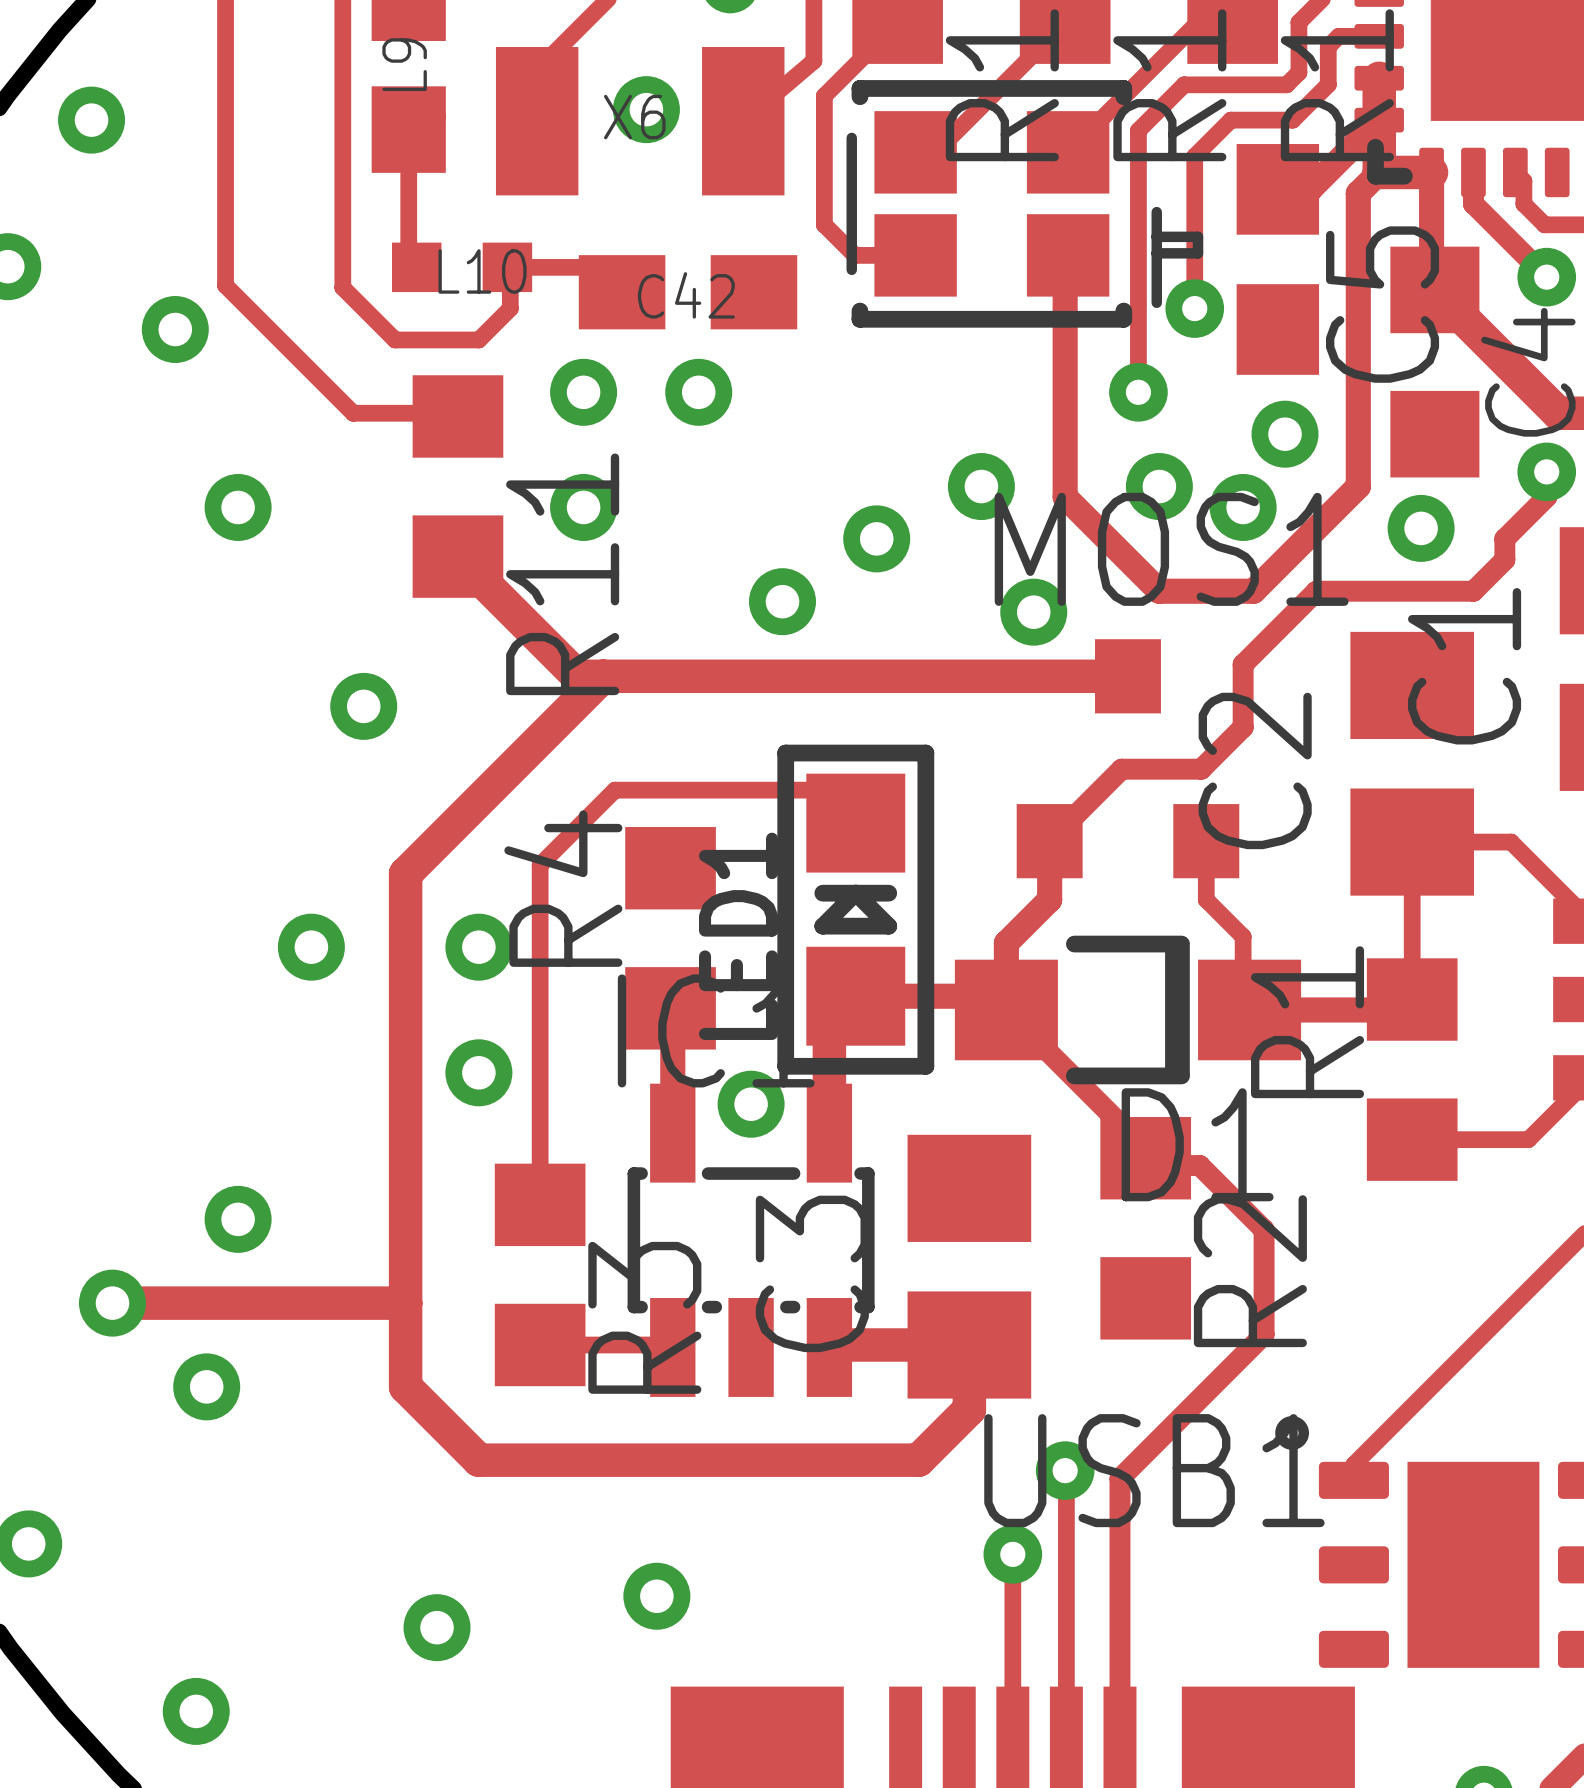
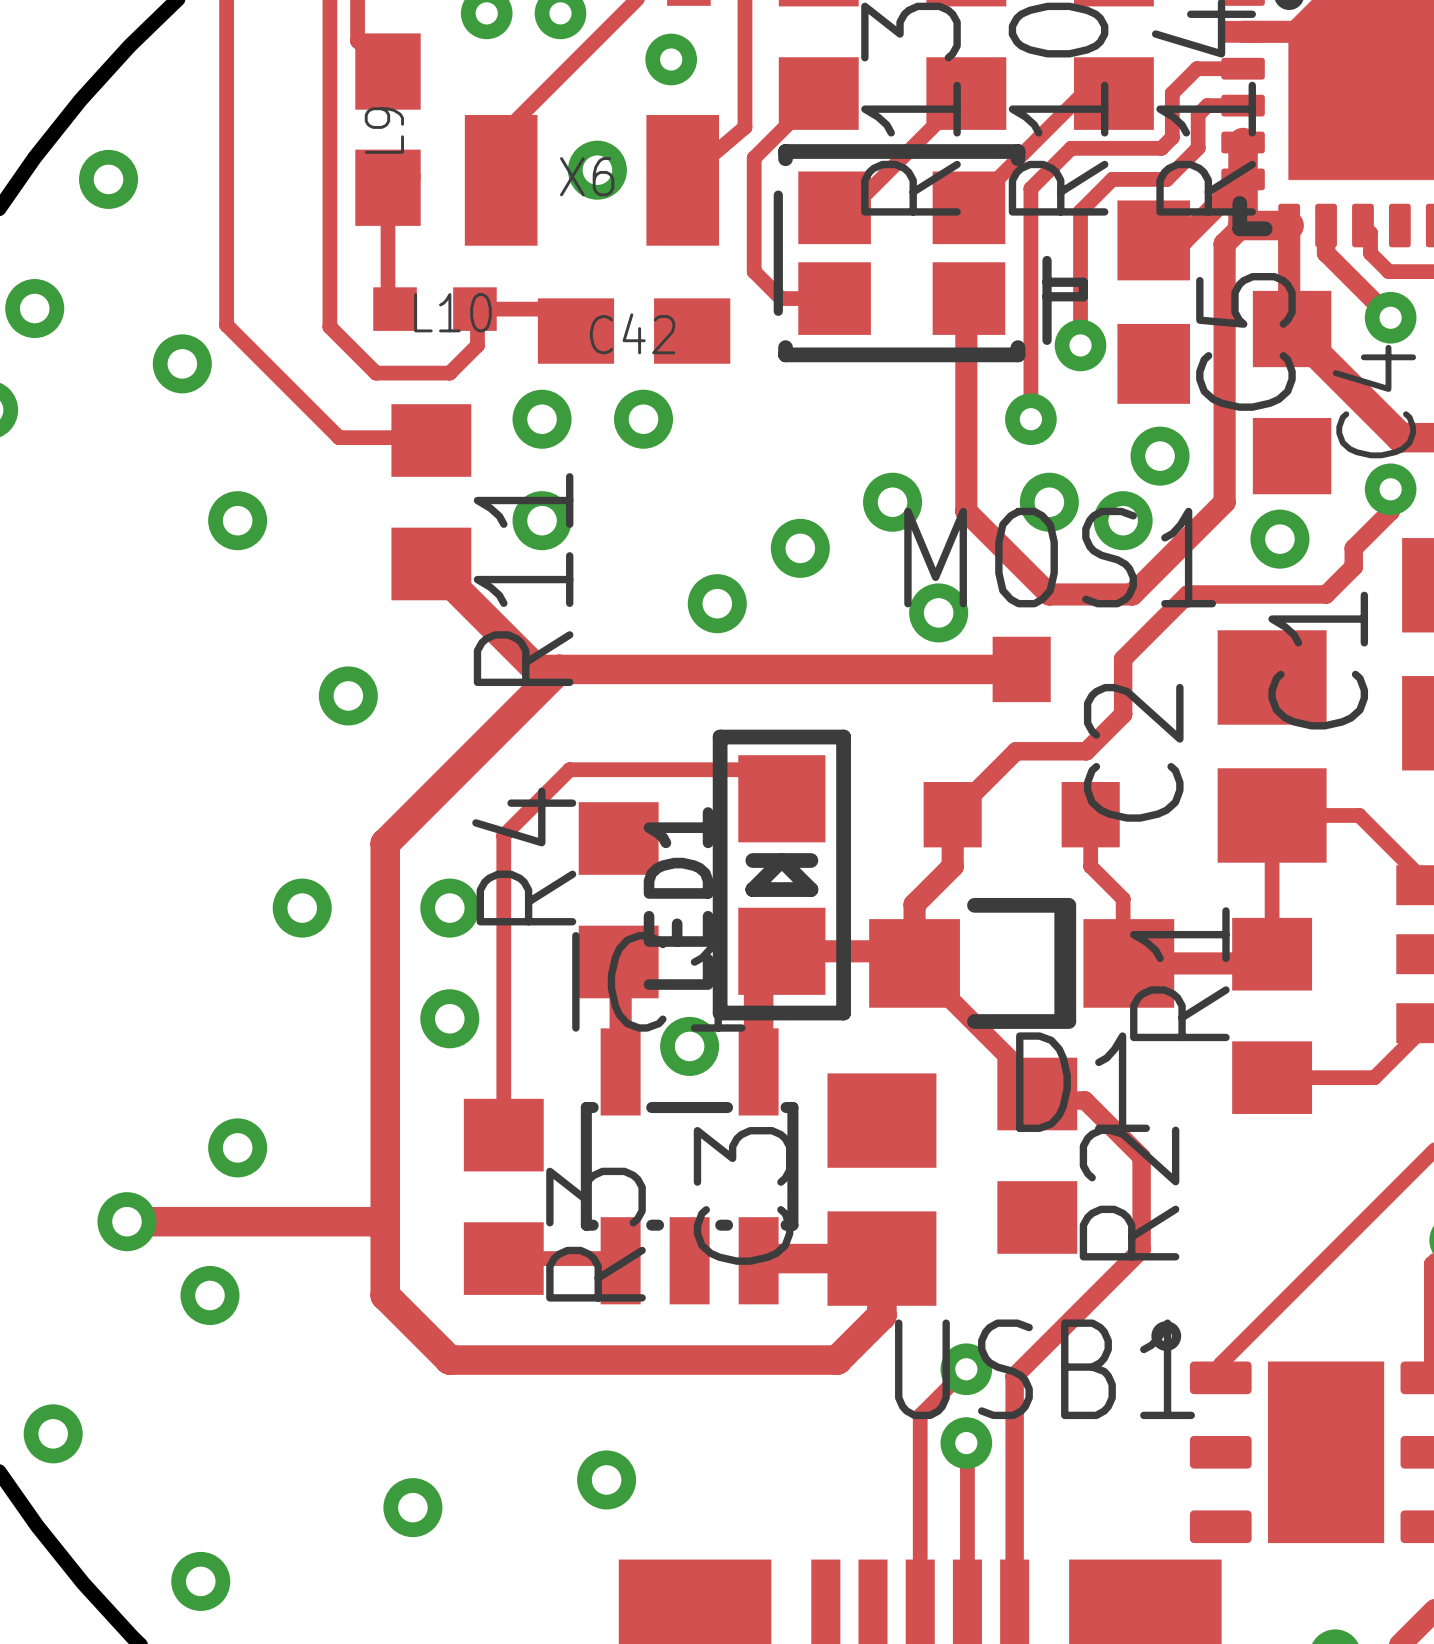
track: (1065, 1470) (1066, 1555) -> (966, 1369) (920, 1415) (920, 1443)
via position: (1012, 1554) -> (966, 1443)

